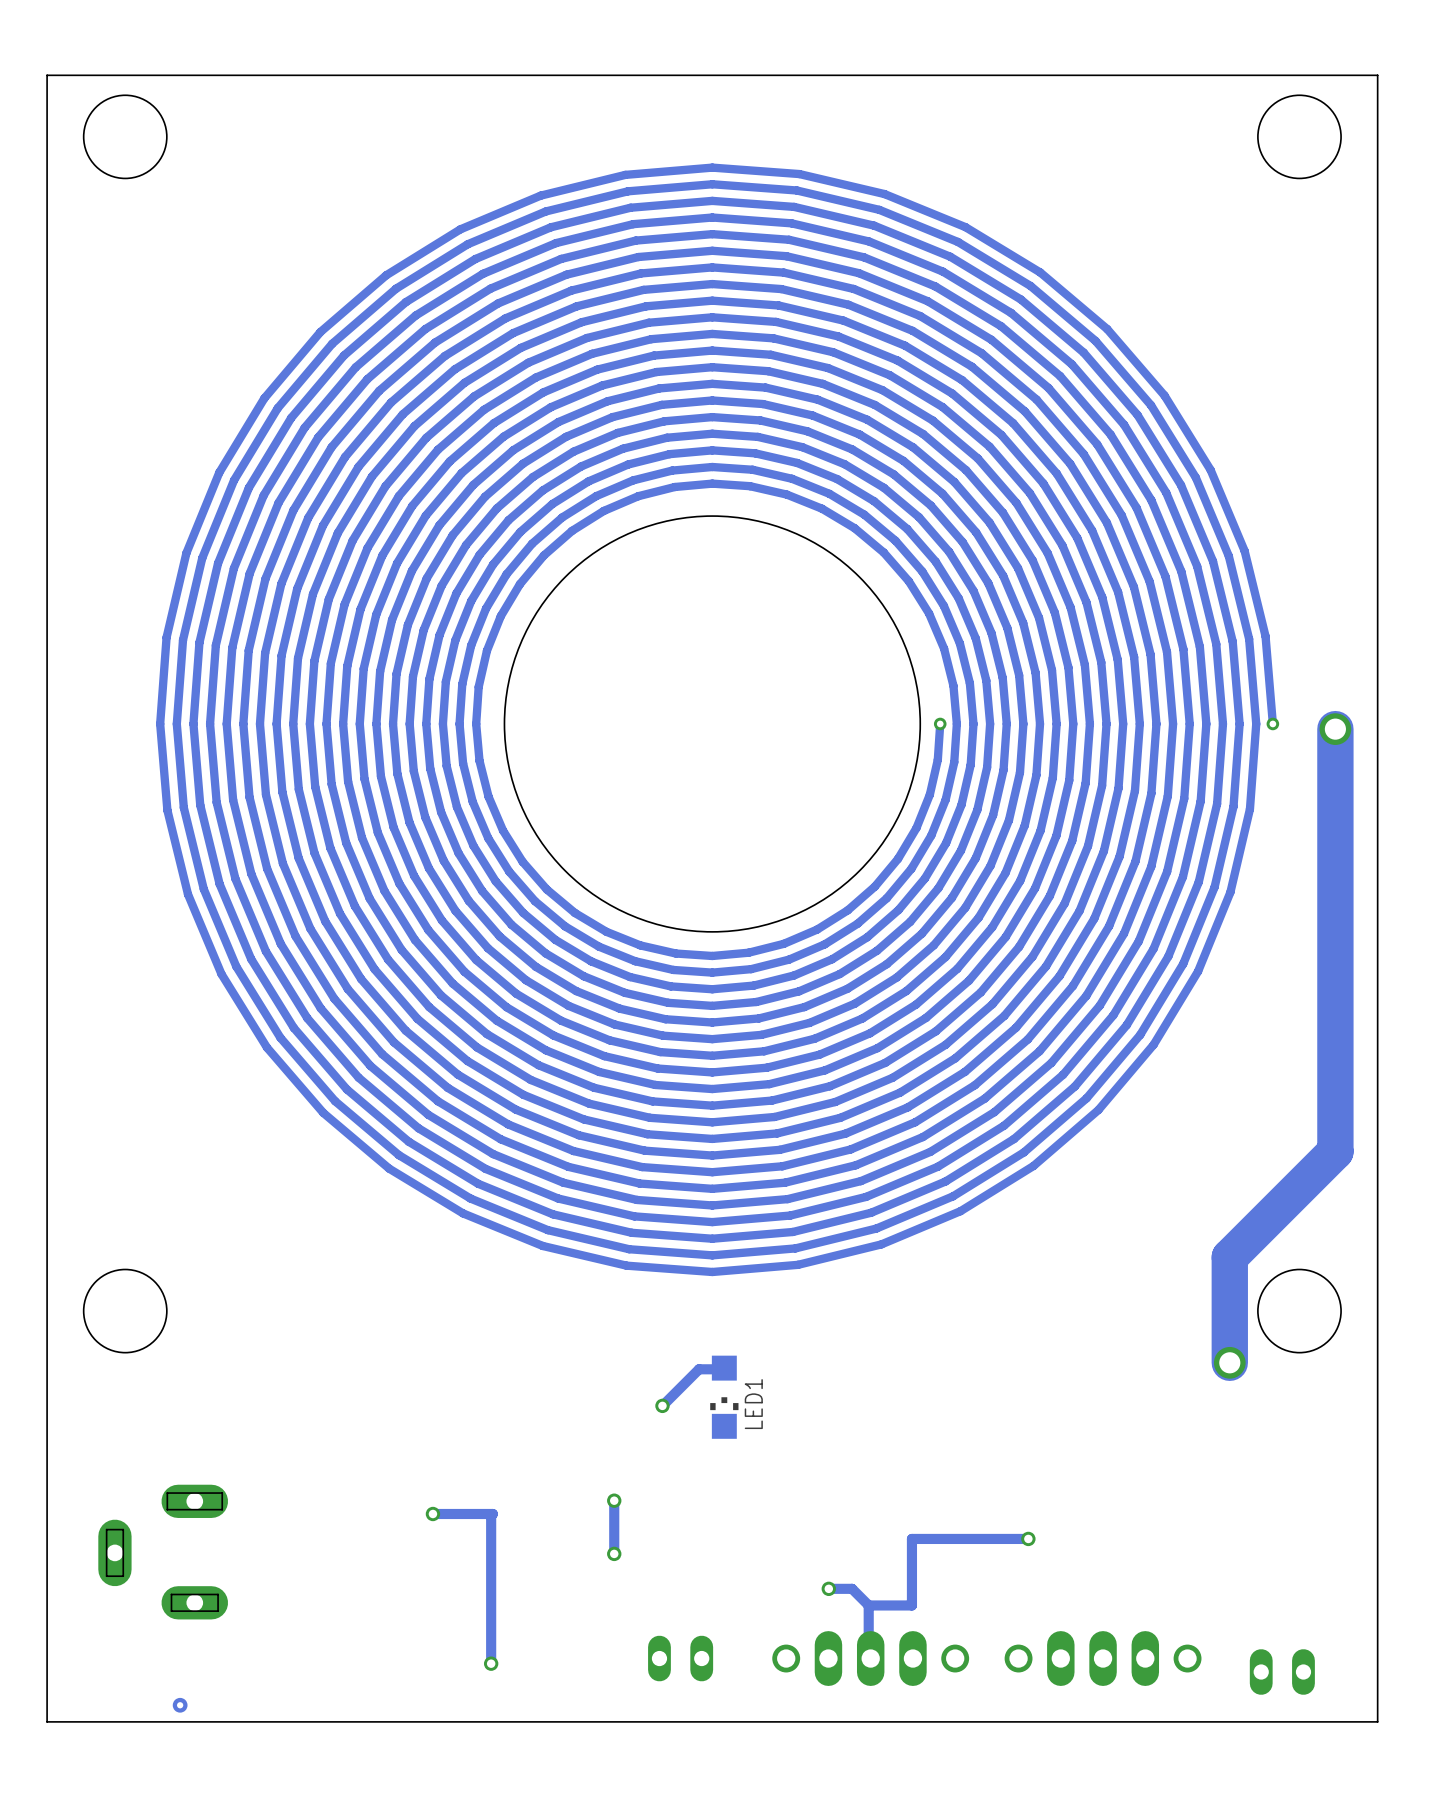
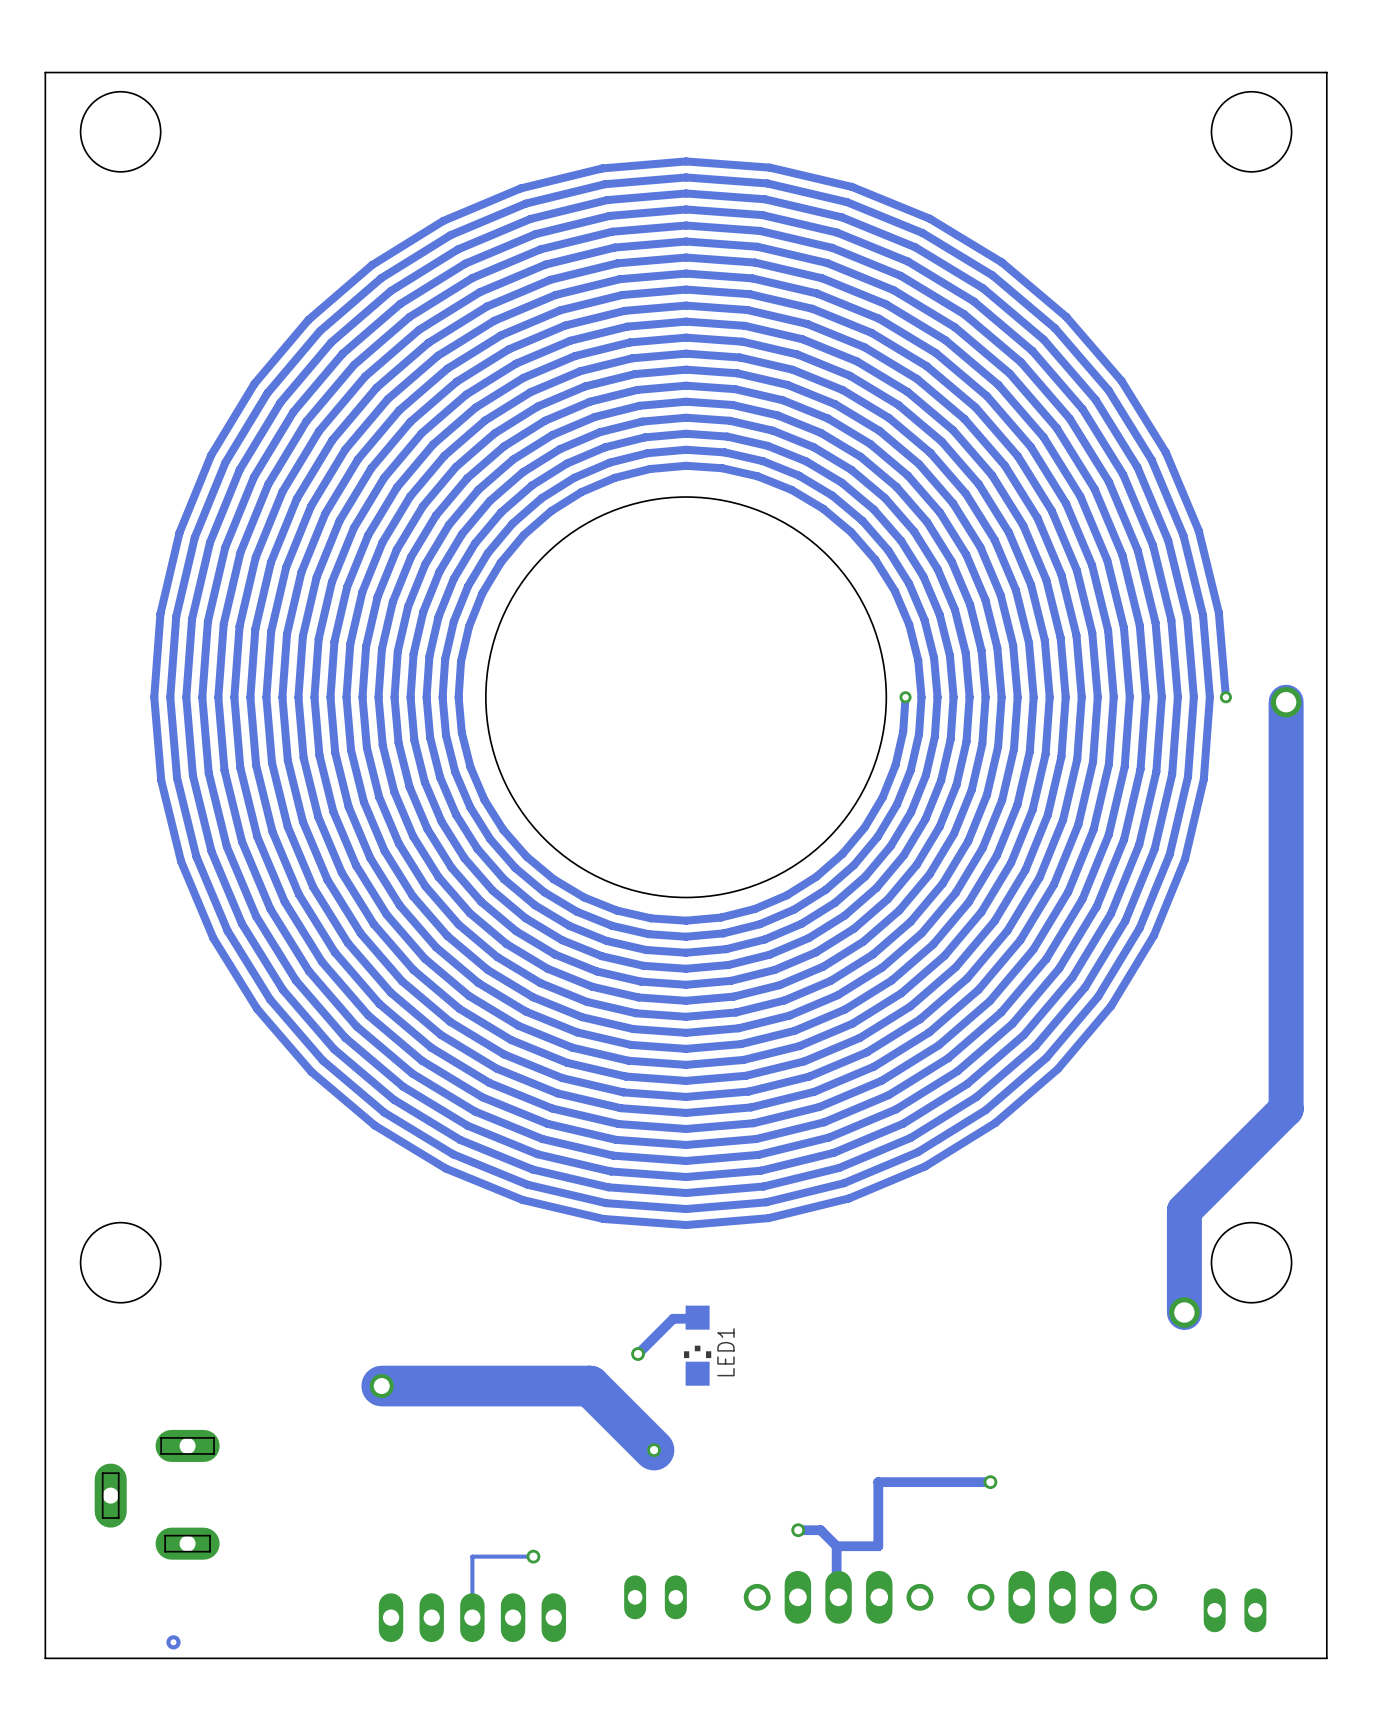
track: none -> (381, 1386) (589, 1386) (654, 1450)
via: none -> (381, 1386)
track: (614, 1500) (614, 1553) -> none
via: (614, 1500) -> none
via: none -> (654, 1450)
track: (432, 1513) (492, 1513) (491, 1515) (491, 1663) -> none
via: (432, 1513) -> none
via: (614, 1553) -> none
track: none -> (533, 1556) (472, 1556) (472, 1617)
via: none -> (533, 1556)
via: (491, 1663) -> none
part: none -> (472, 1617)

